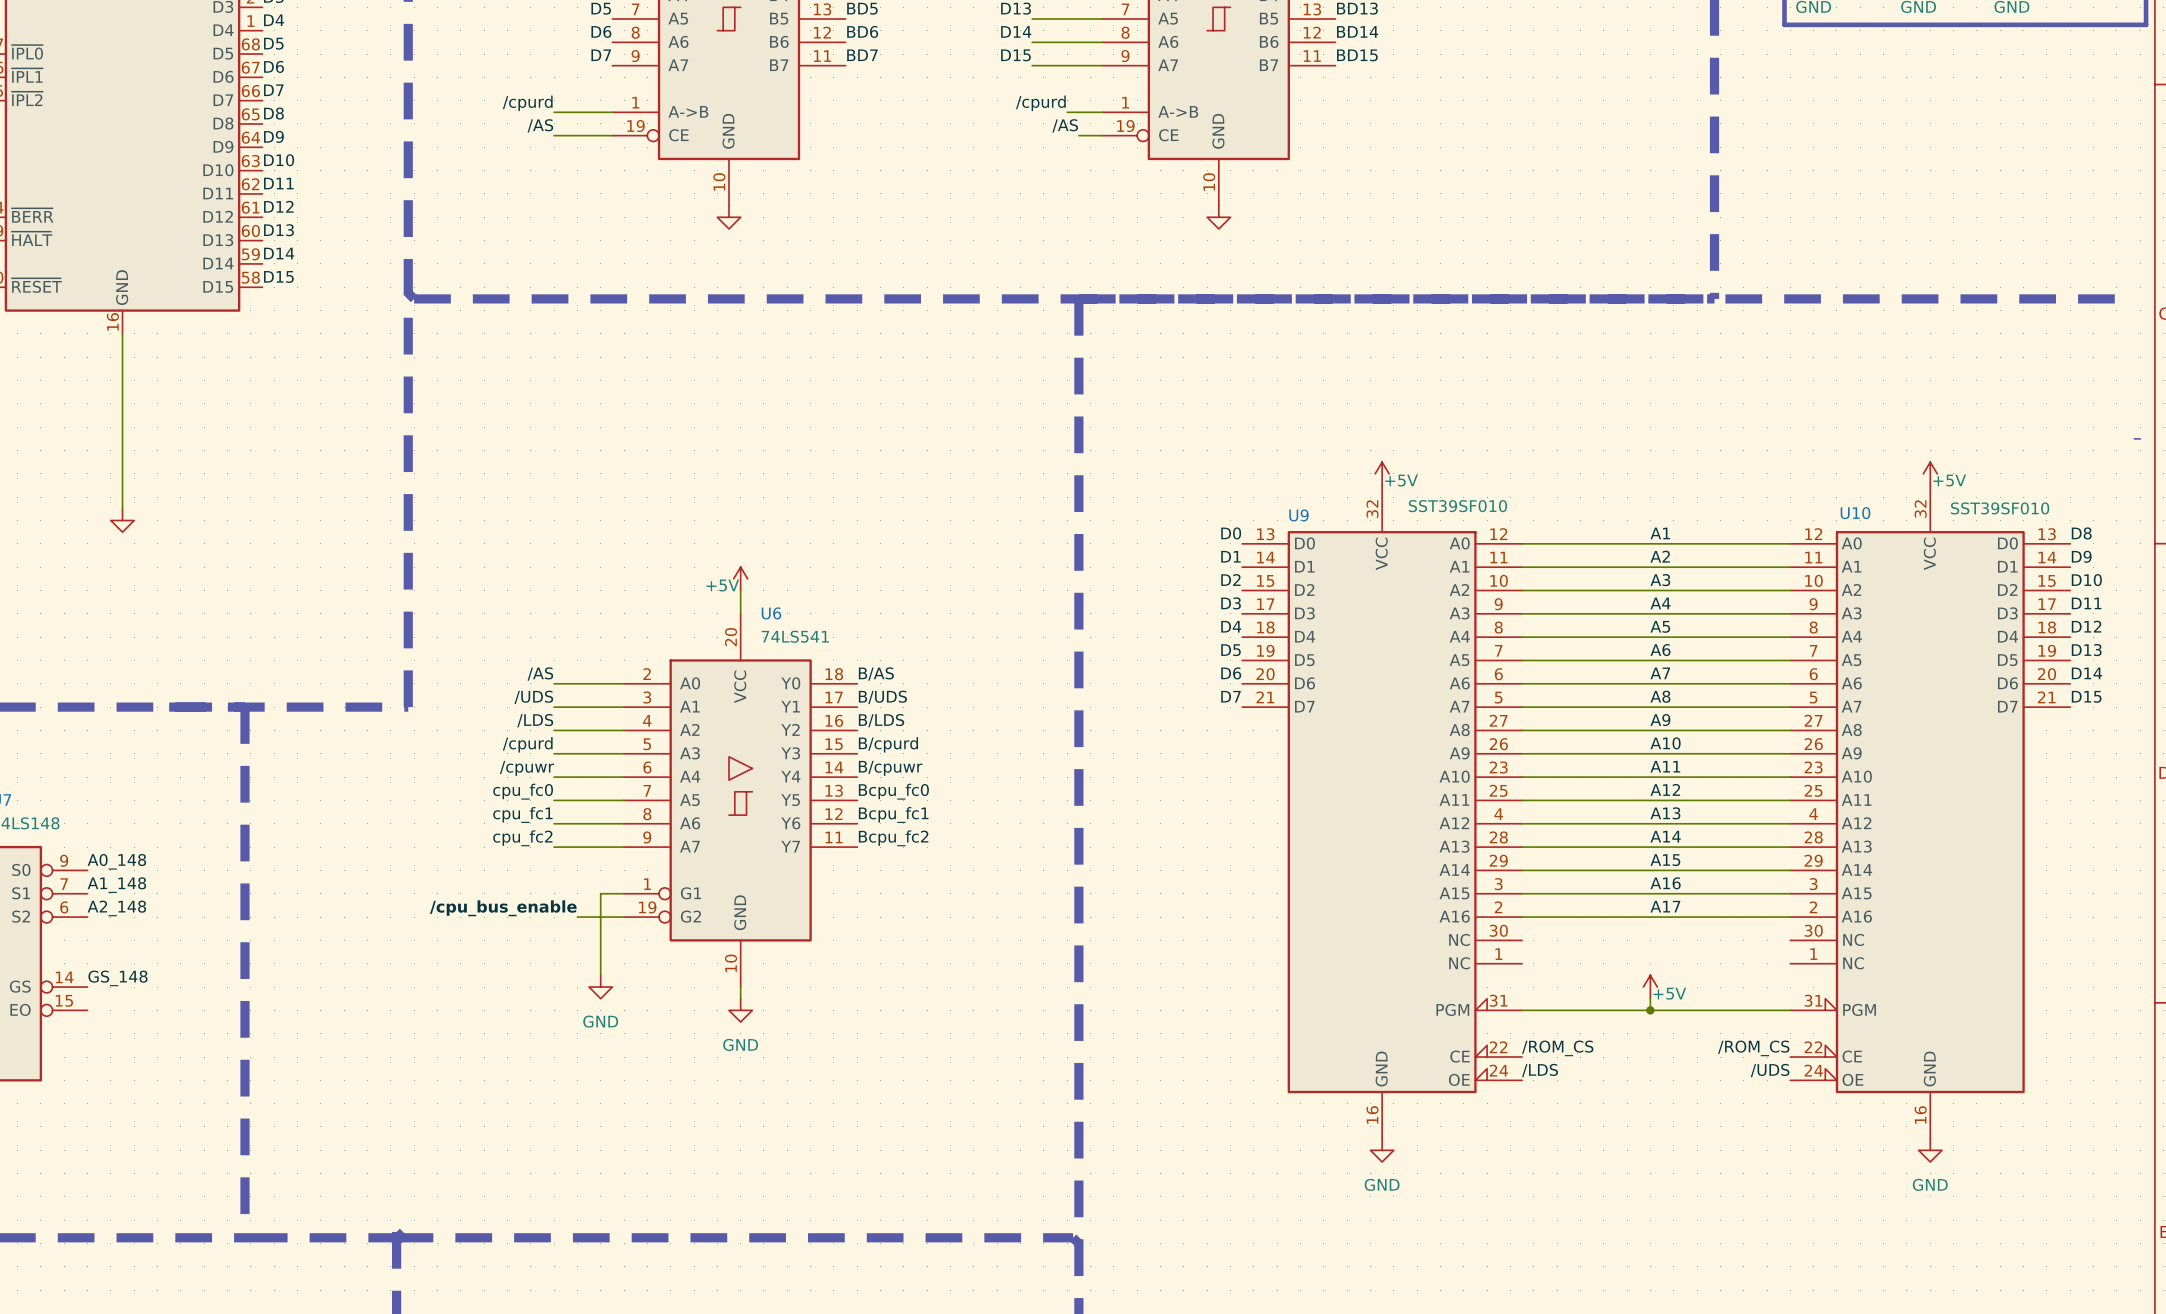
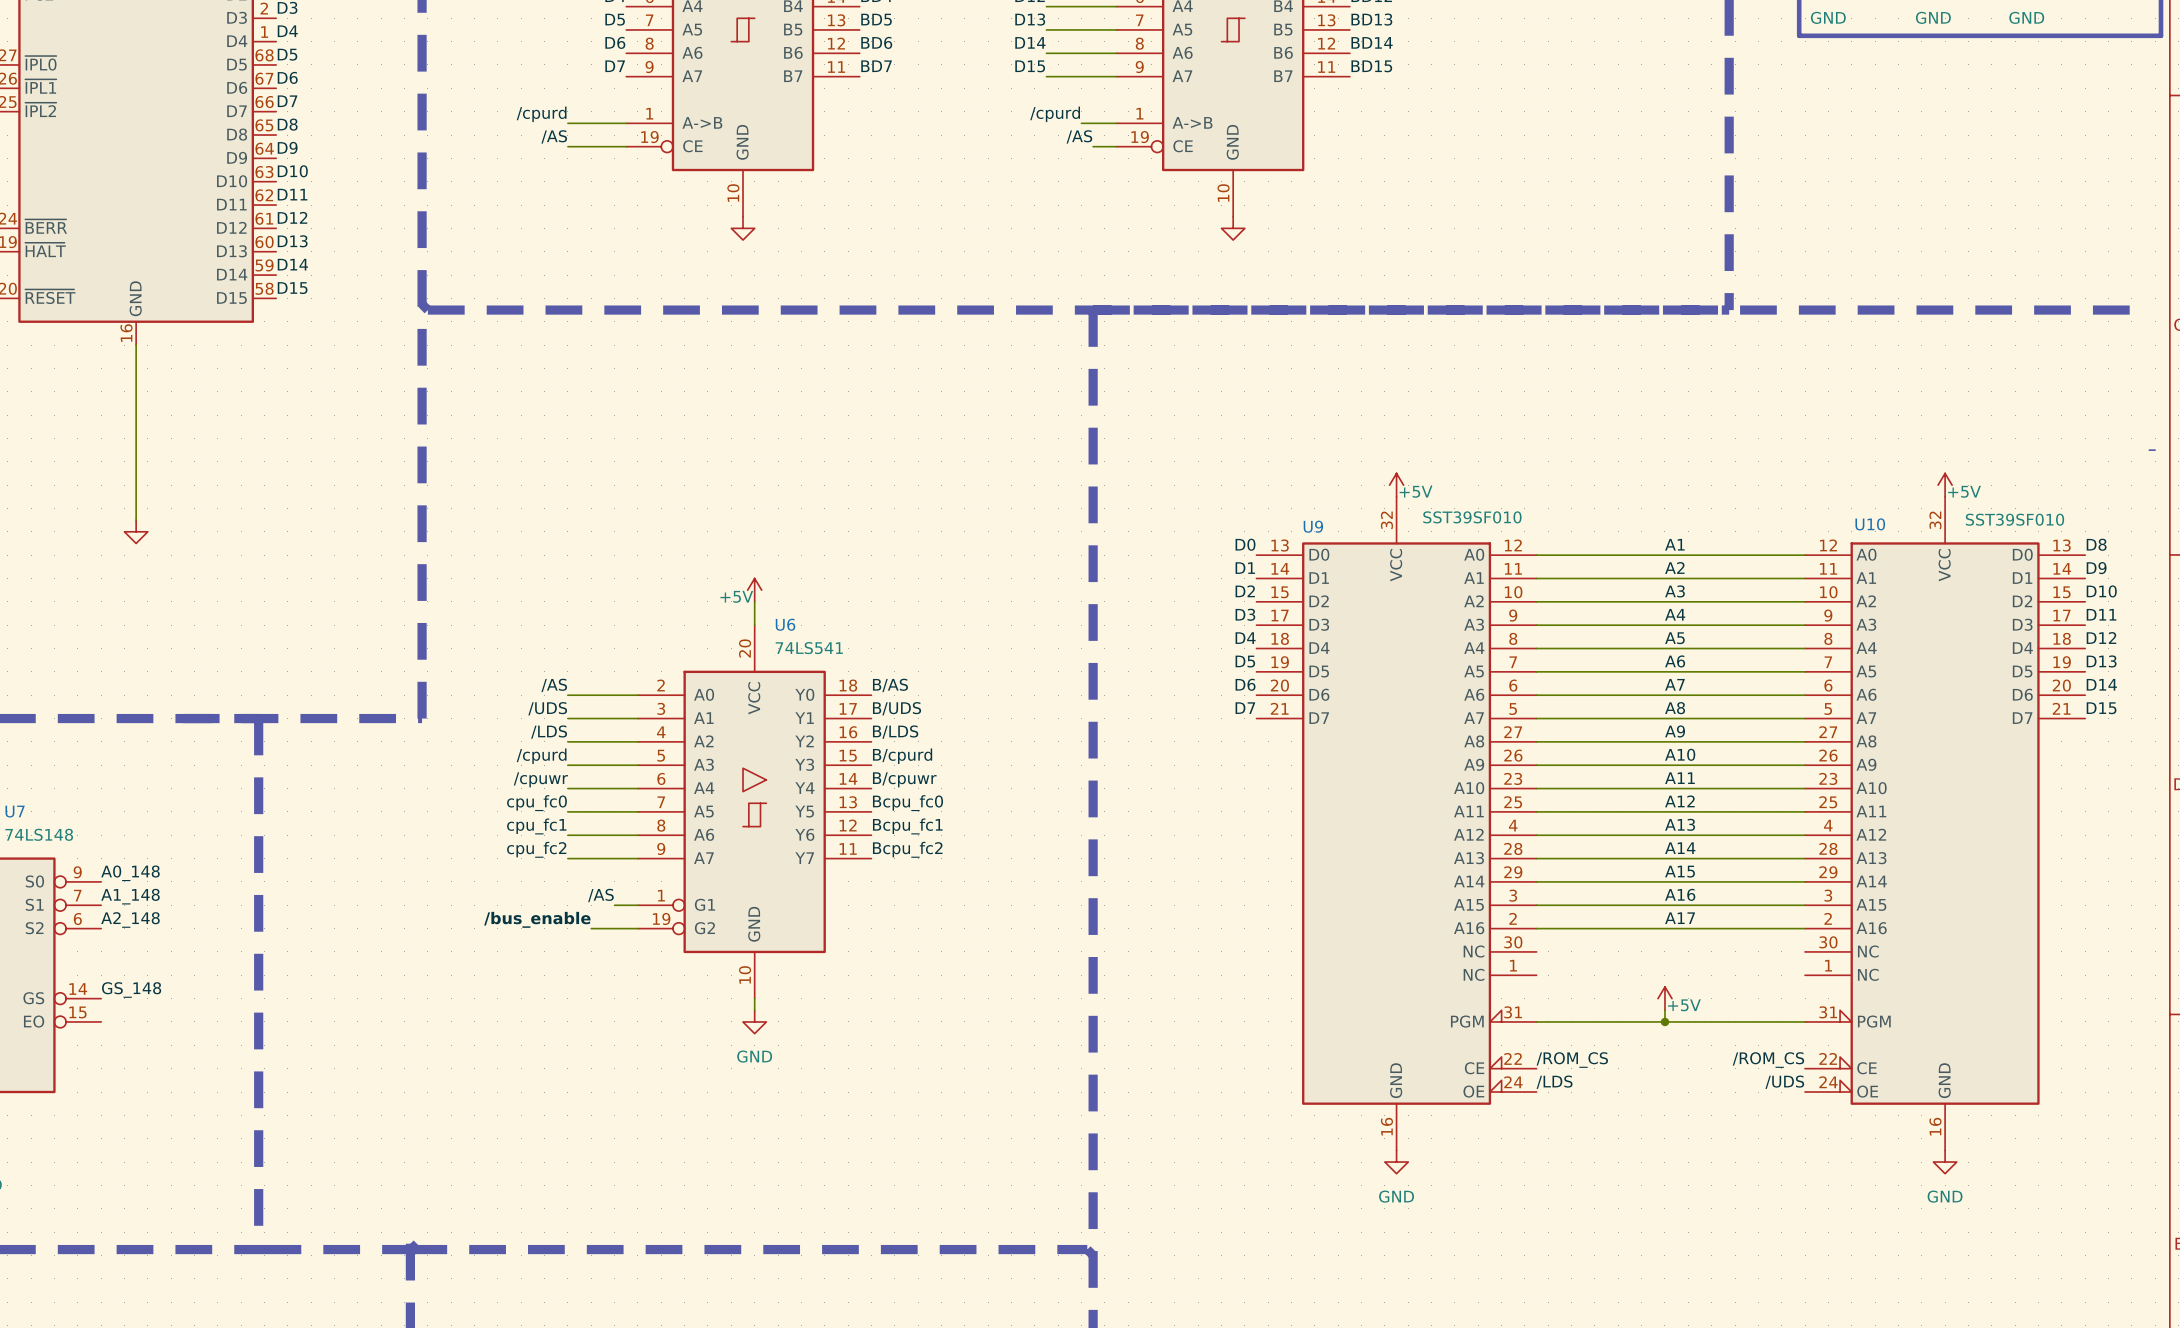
label: none -> /AS (600, 895)
wire: (600, 893) (600, 975) -> none
label: /cpu_bus_enable (503, 908) -> /bus_enable (537, 919)
power symbol: GND (600, 987) -> none

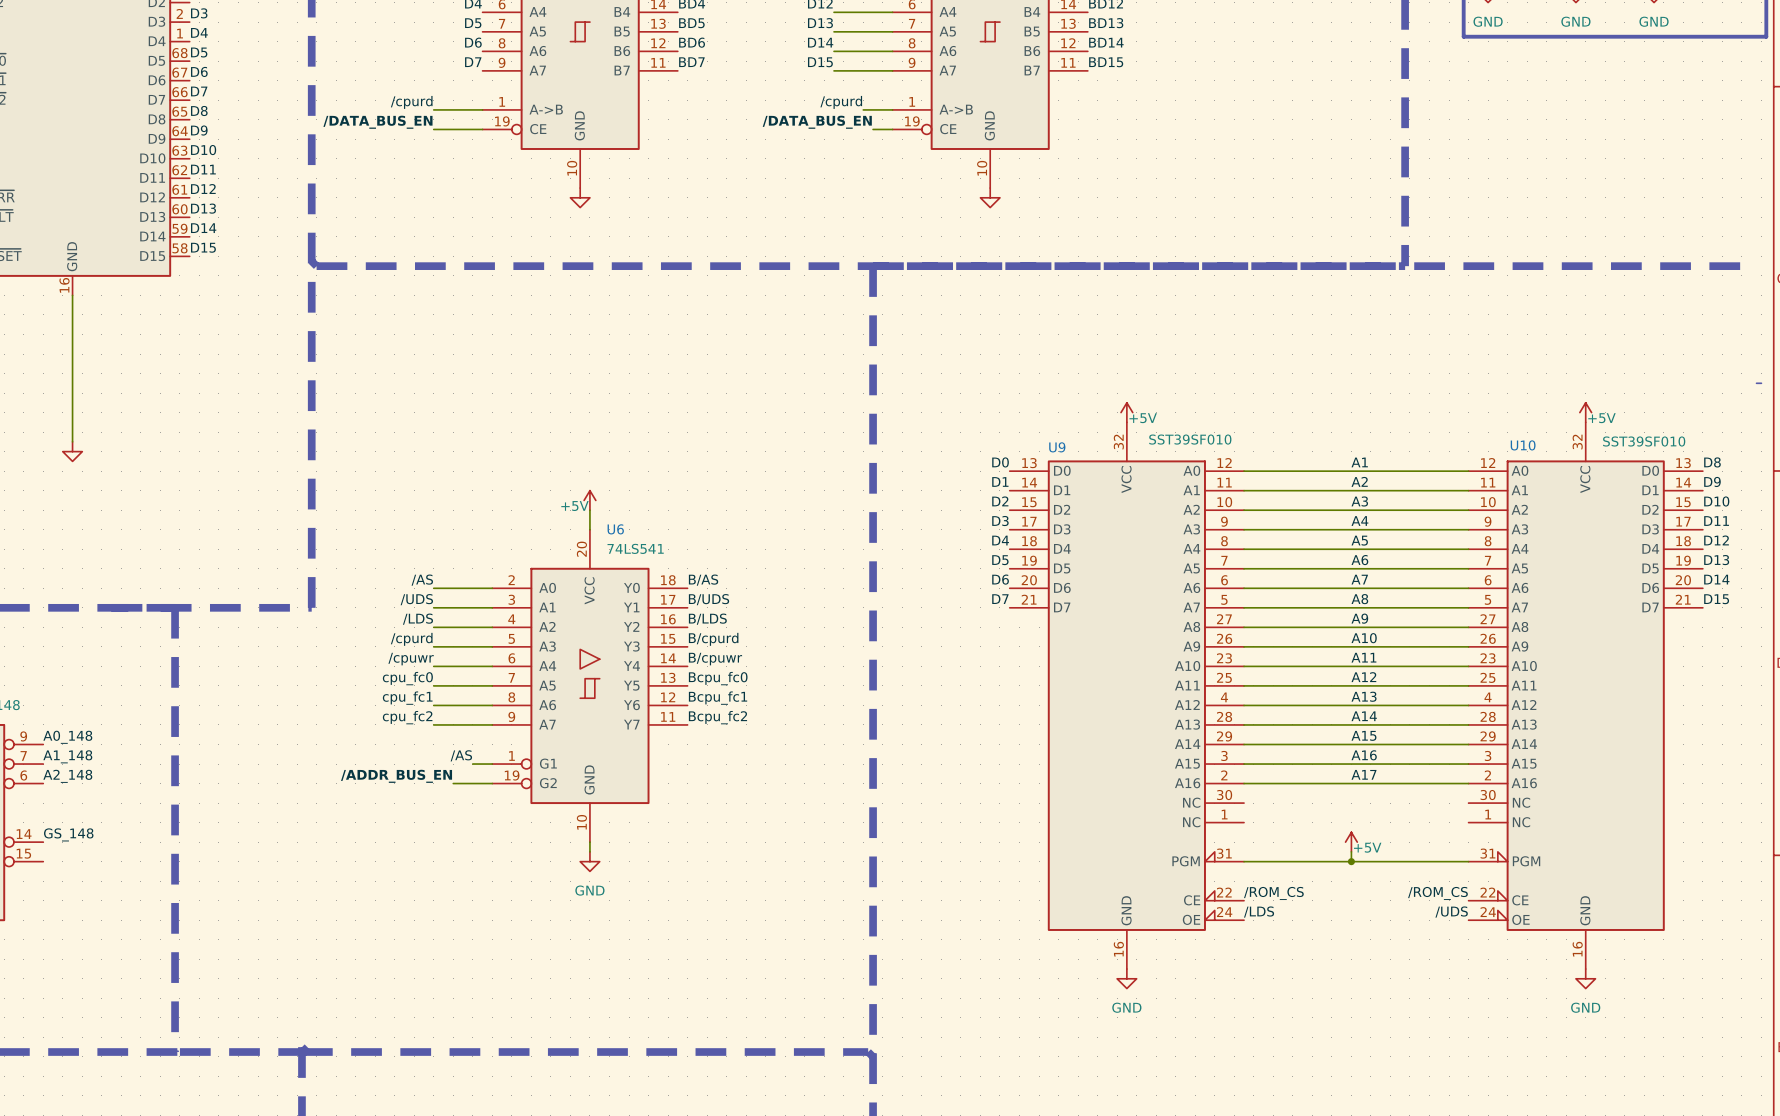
label: /AS (554, 136) -> /DATA_BUS_EN (377, 122)
label: /AS (1079, 136) -> /DATA_BUS_EN (817, 122)
label: /bus_enable (537, 919) -> /ADDR_BUS_EN (396, 776)

